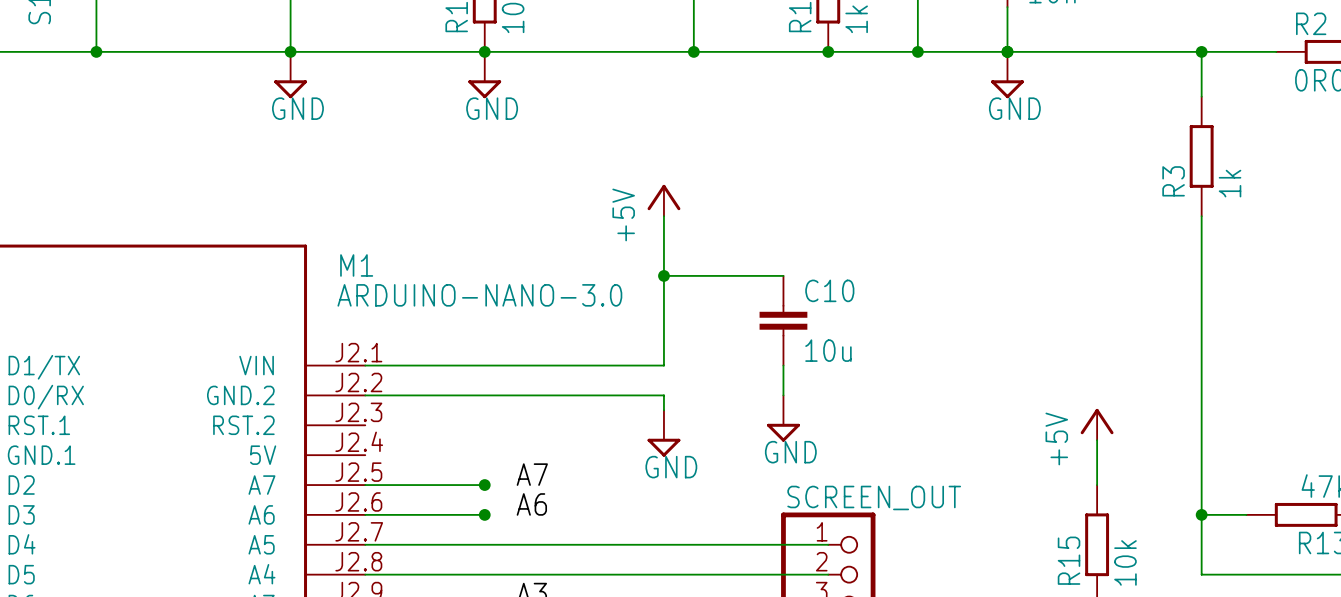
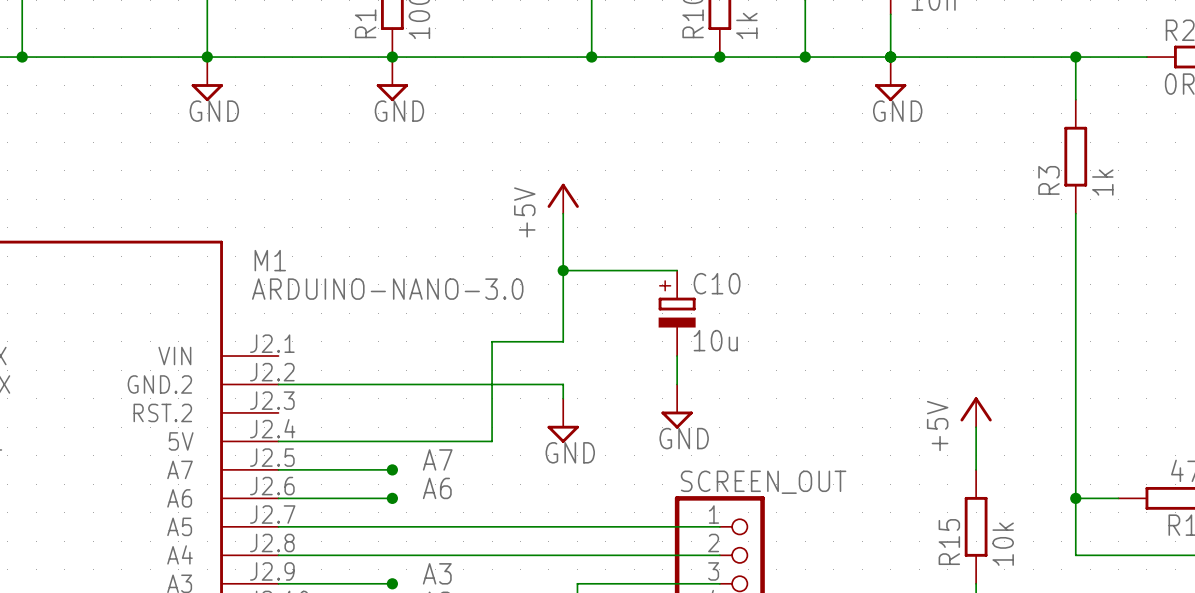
C10 symbol: [759, 275, 808, 366] -> [658, 270, 696, 357]
wire: (663, 350) (663, 365) (365, 365) -> (563, 341) (492, 341) (492, 441) (278, 441)

